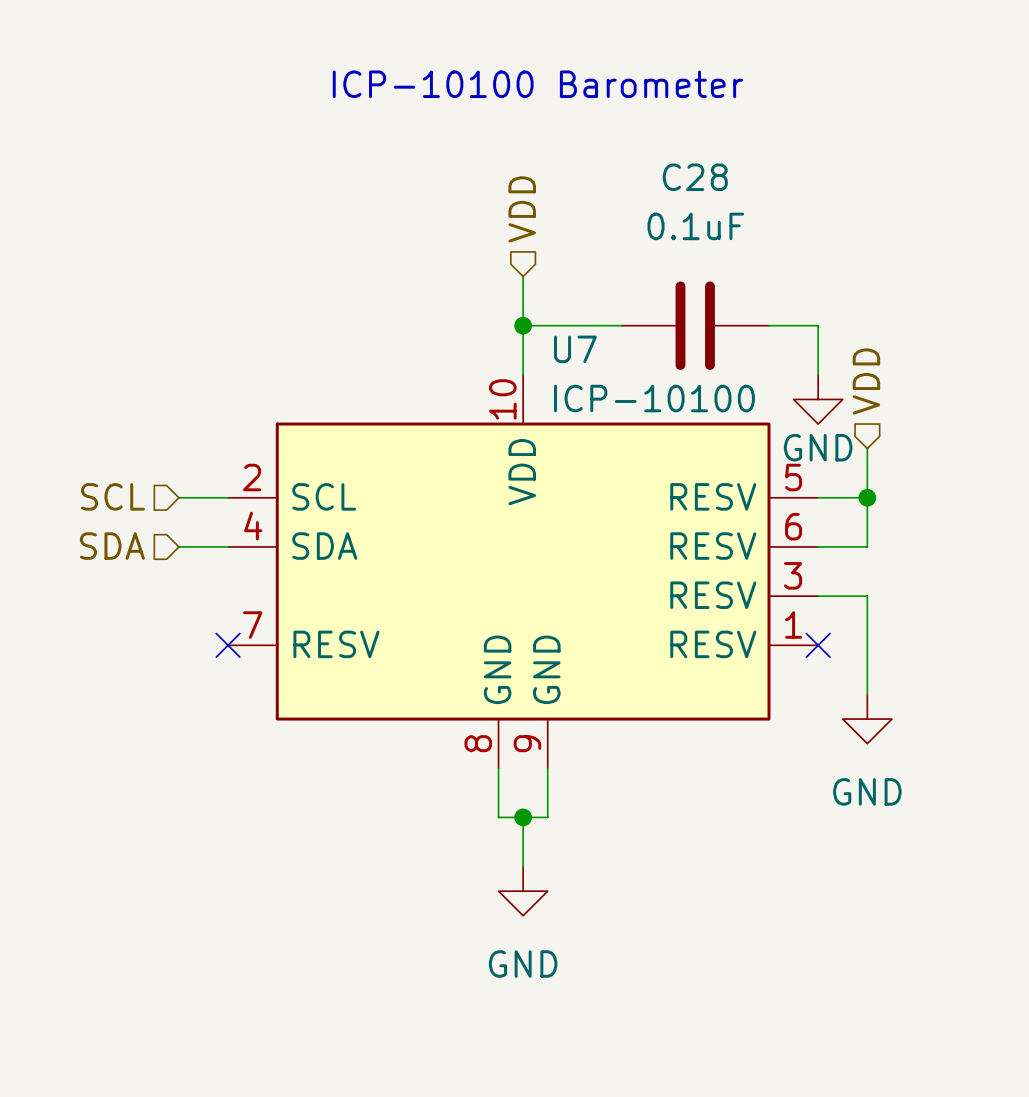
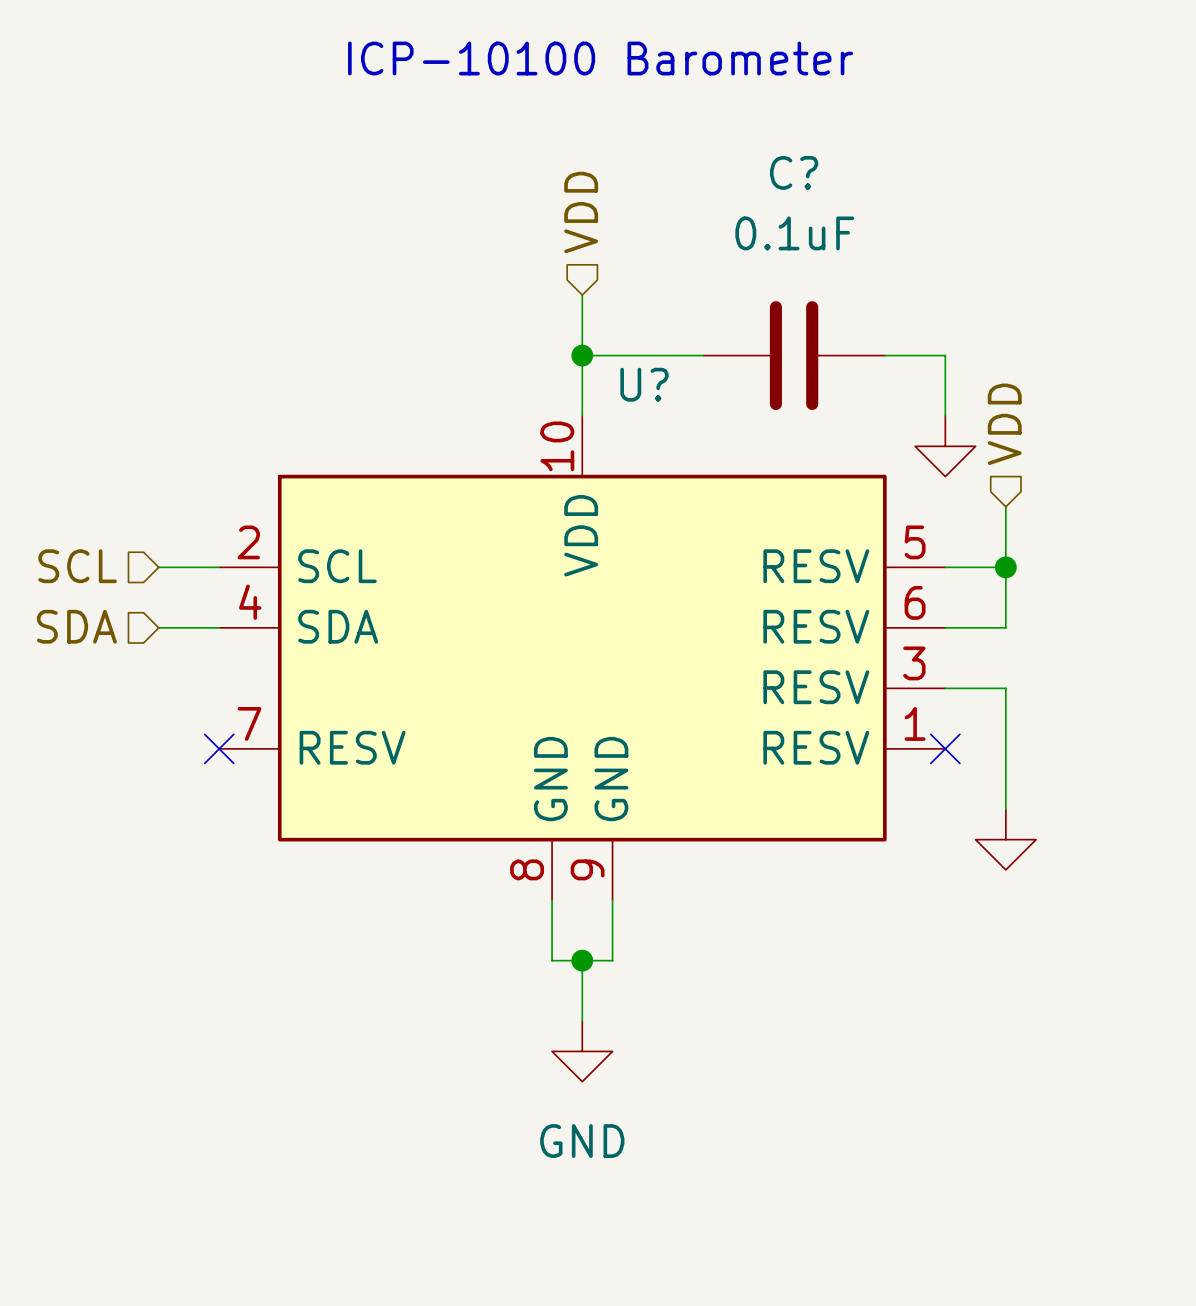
C28 name: C28 (695, 177) -> C? (794, 172)
U7 name: U7 (575, 349) -> U? (644, 384)
U7 value: ICP-10100 (654, 398) -> none
power symbol text: GND (818, 447) -> none
power symbol text: GND (867, 791) -> none

